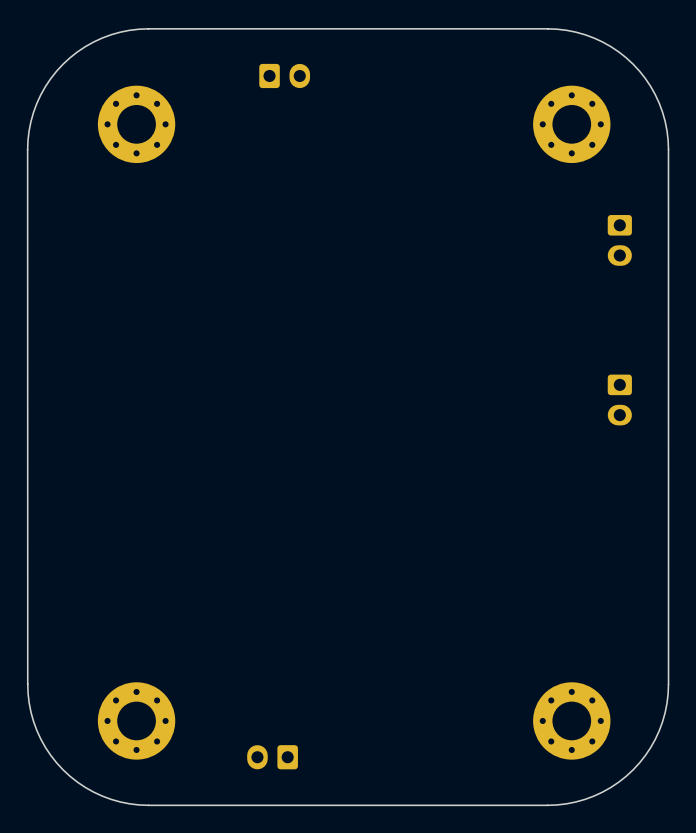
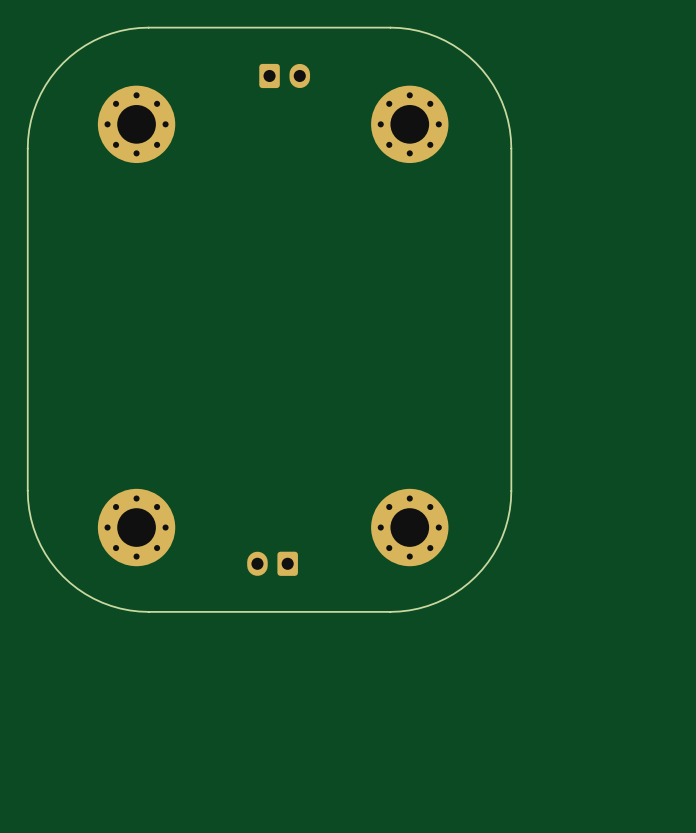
board edge: (547, 28) (148, 28) (139, 29) (111, 34) (85, 46) (63, 64) (45, 86) (33, 112) (27, 149) (28, 693) (33, 721) (45, 747) (63, 769) (85, 787) (111, 799) (148, 805) (557, 804) (584, 799) (610, 787) (633, 769) (650, 747) (662, 721) (668, 684) (667, 130) (662, 112) (650, 86) (626, 57) (610, 46) (585, 34) (566, 30) (557, 29) (547, 28) -> (390, 27) (427, 33) (461, 50) (488, 77) (502, 102) (507, 120) (511, 148) (511, 491) (507, 519) (498, 545) (482, 569) (461, 588) (436, 602) (409, 610) (148, 611) (120, 608) (93, 598) (70, 582) (50, 561) (33, 528) (28, 500) (27, 148) (31, 120) (40, 93) (56, 70) (77, 50) (102, 36) (129, 29) (390, 27)
part position: (571, 124) -> (409, 124)
part: (619, 240) -> none
part: (619, 399) -> none
part: none -> (136, 527)
part: none -> (409, 527)
part: none -> (272, 563)
part: (136, 720) -> none
part: (571, 720) -> none
part: (272, 757) -> none

